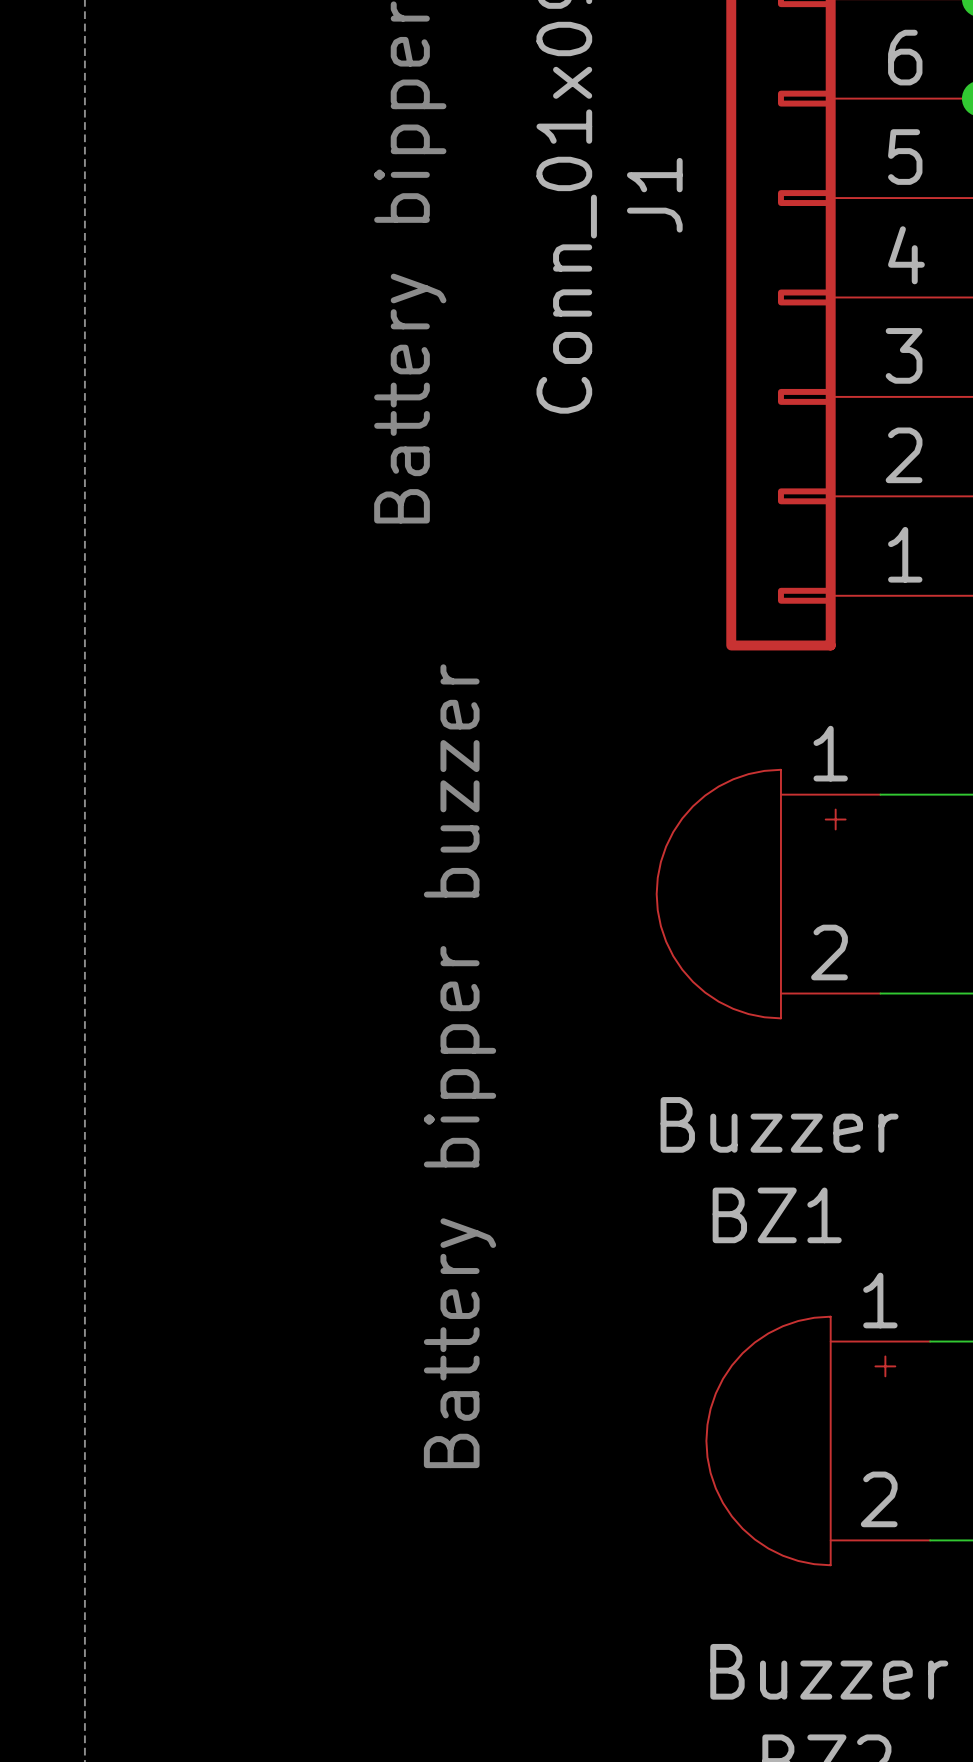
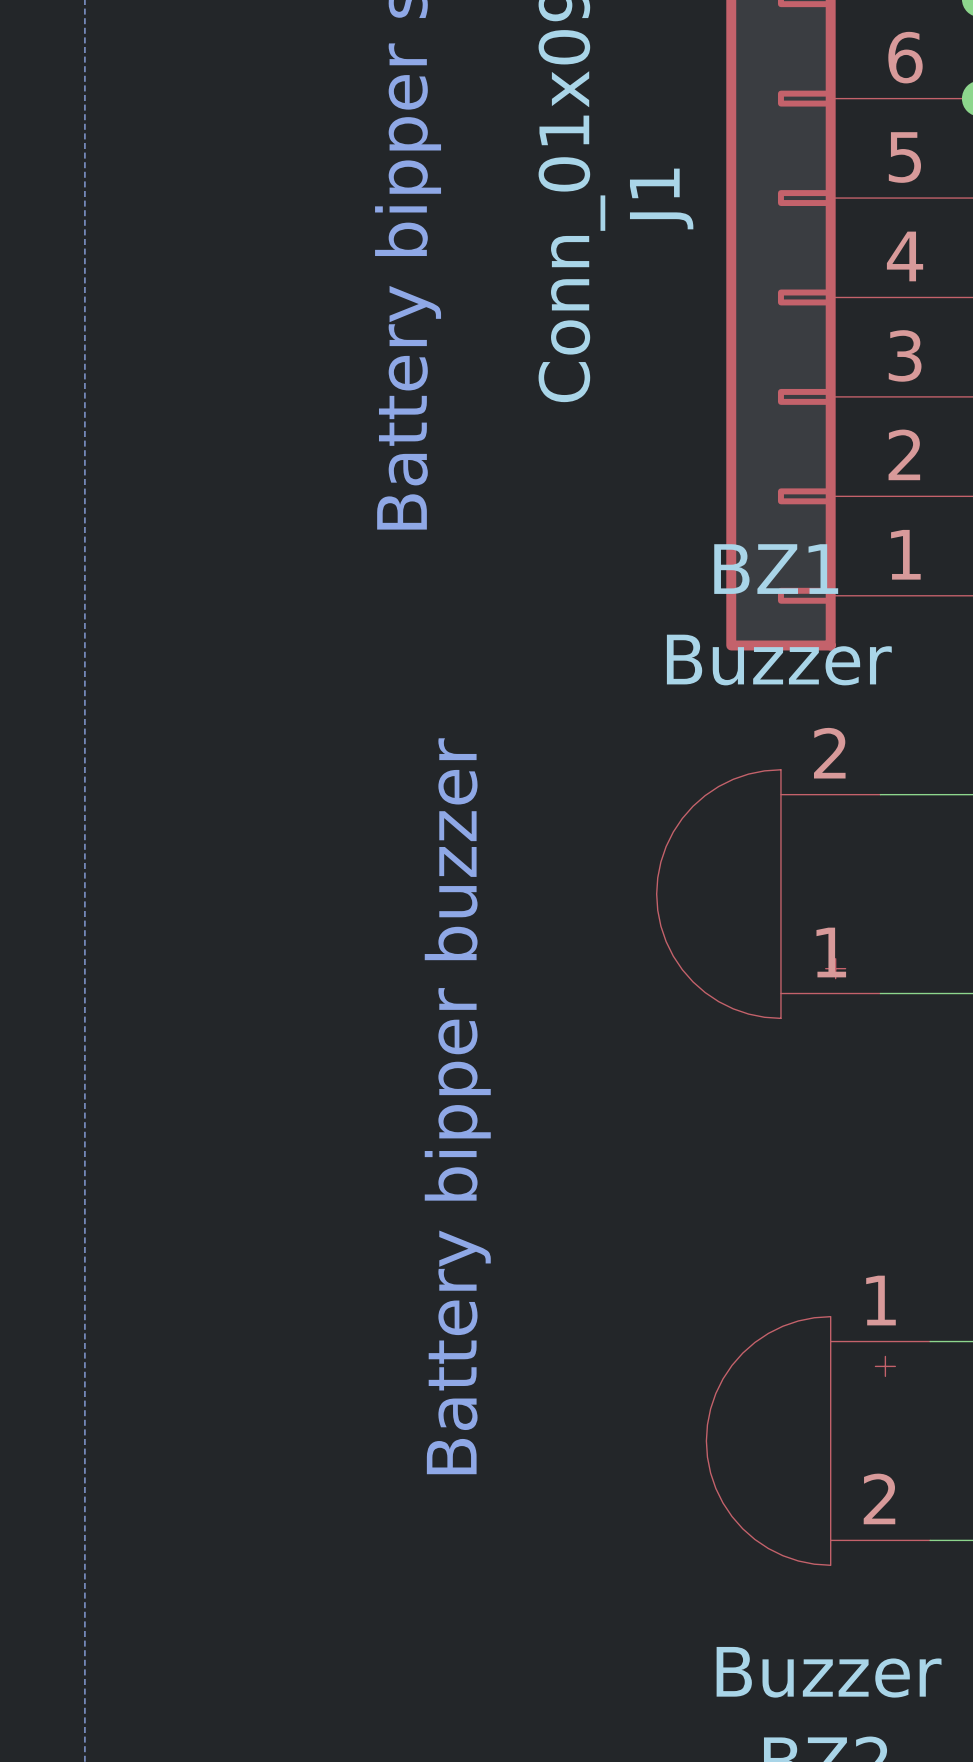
BZ1 flip: as is (751, 894) -> up-down (751, 894)

